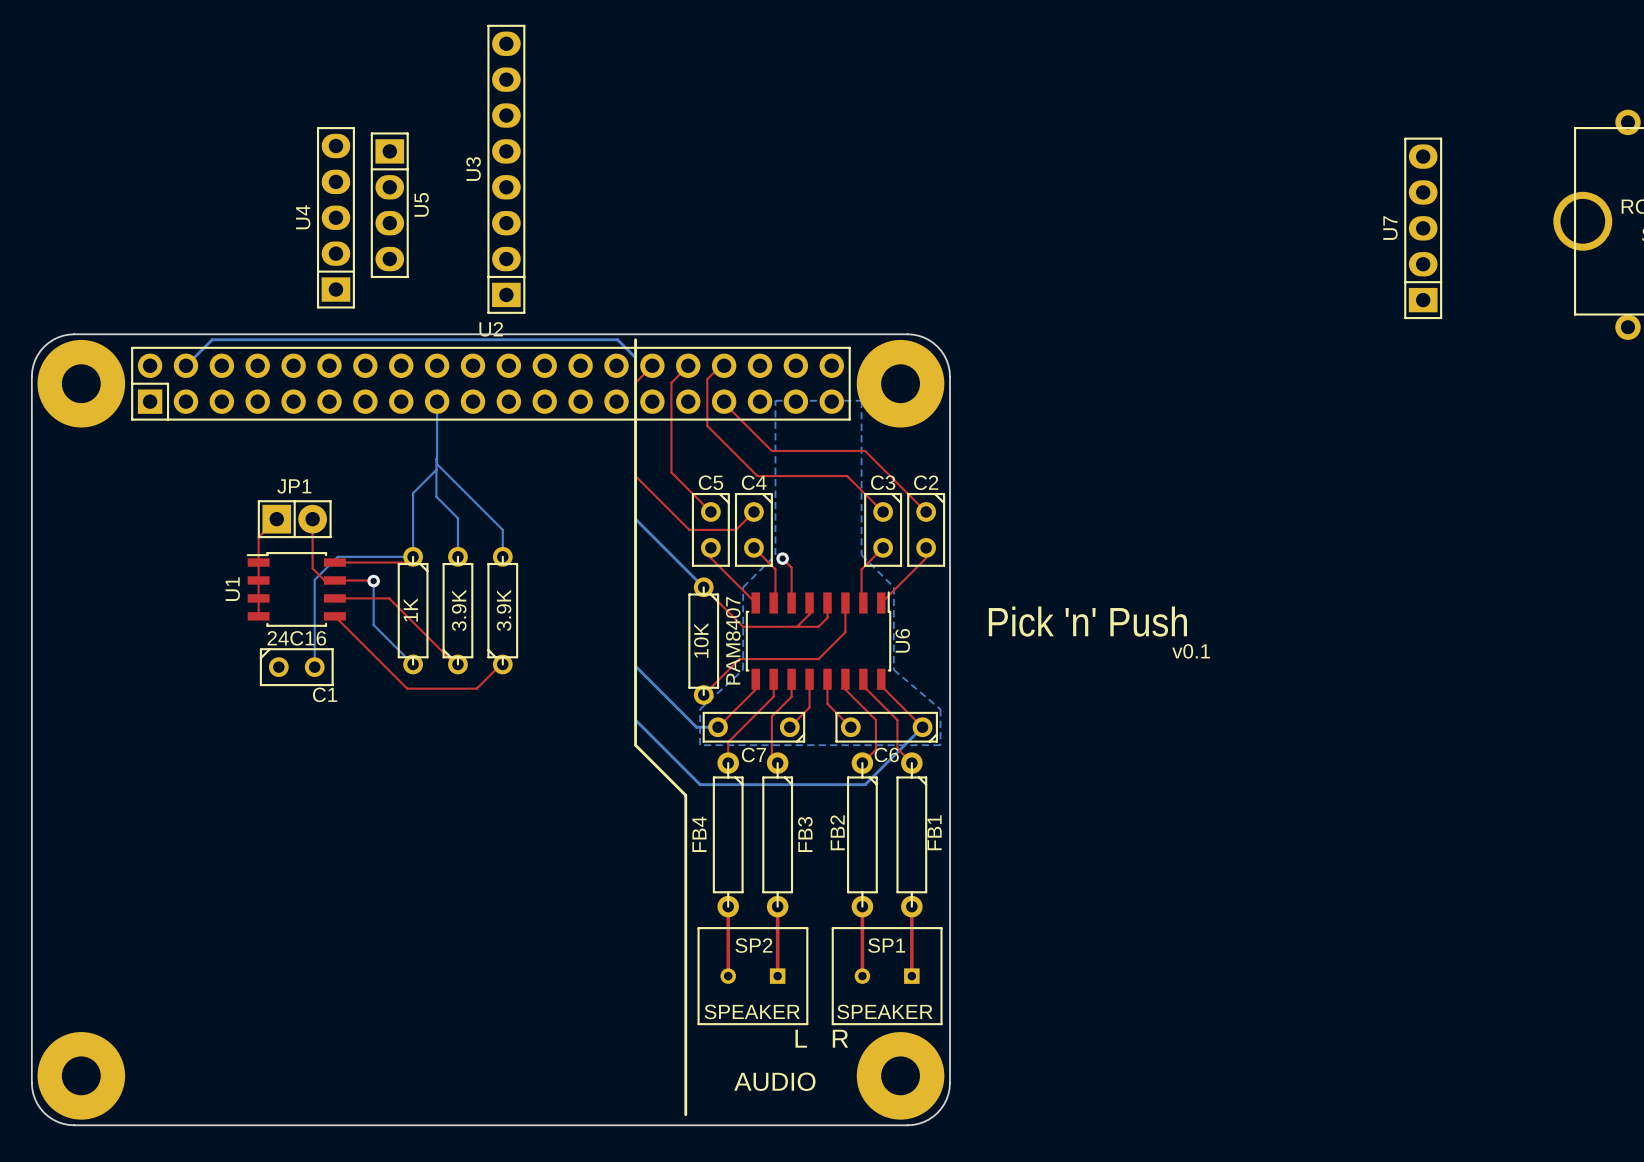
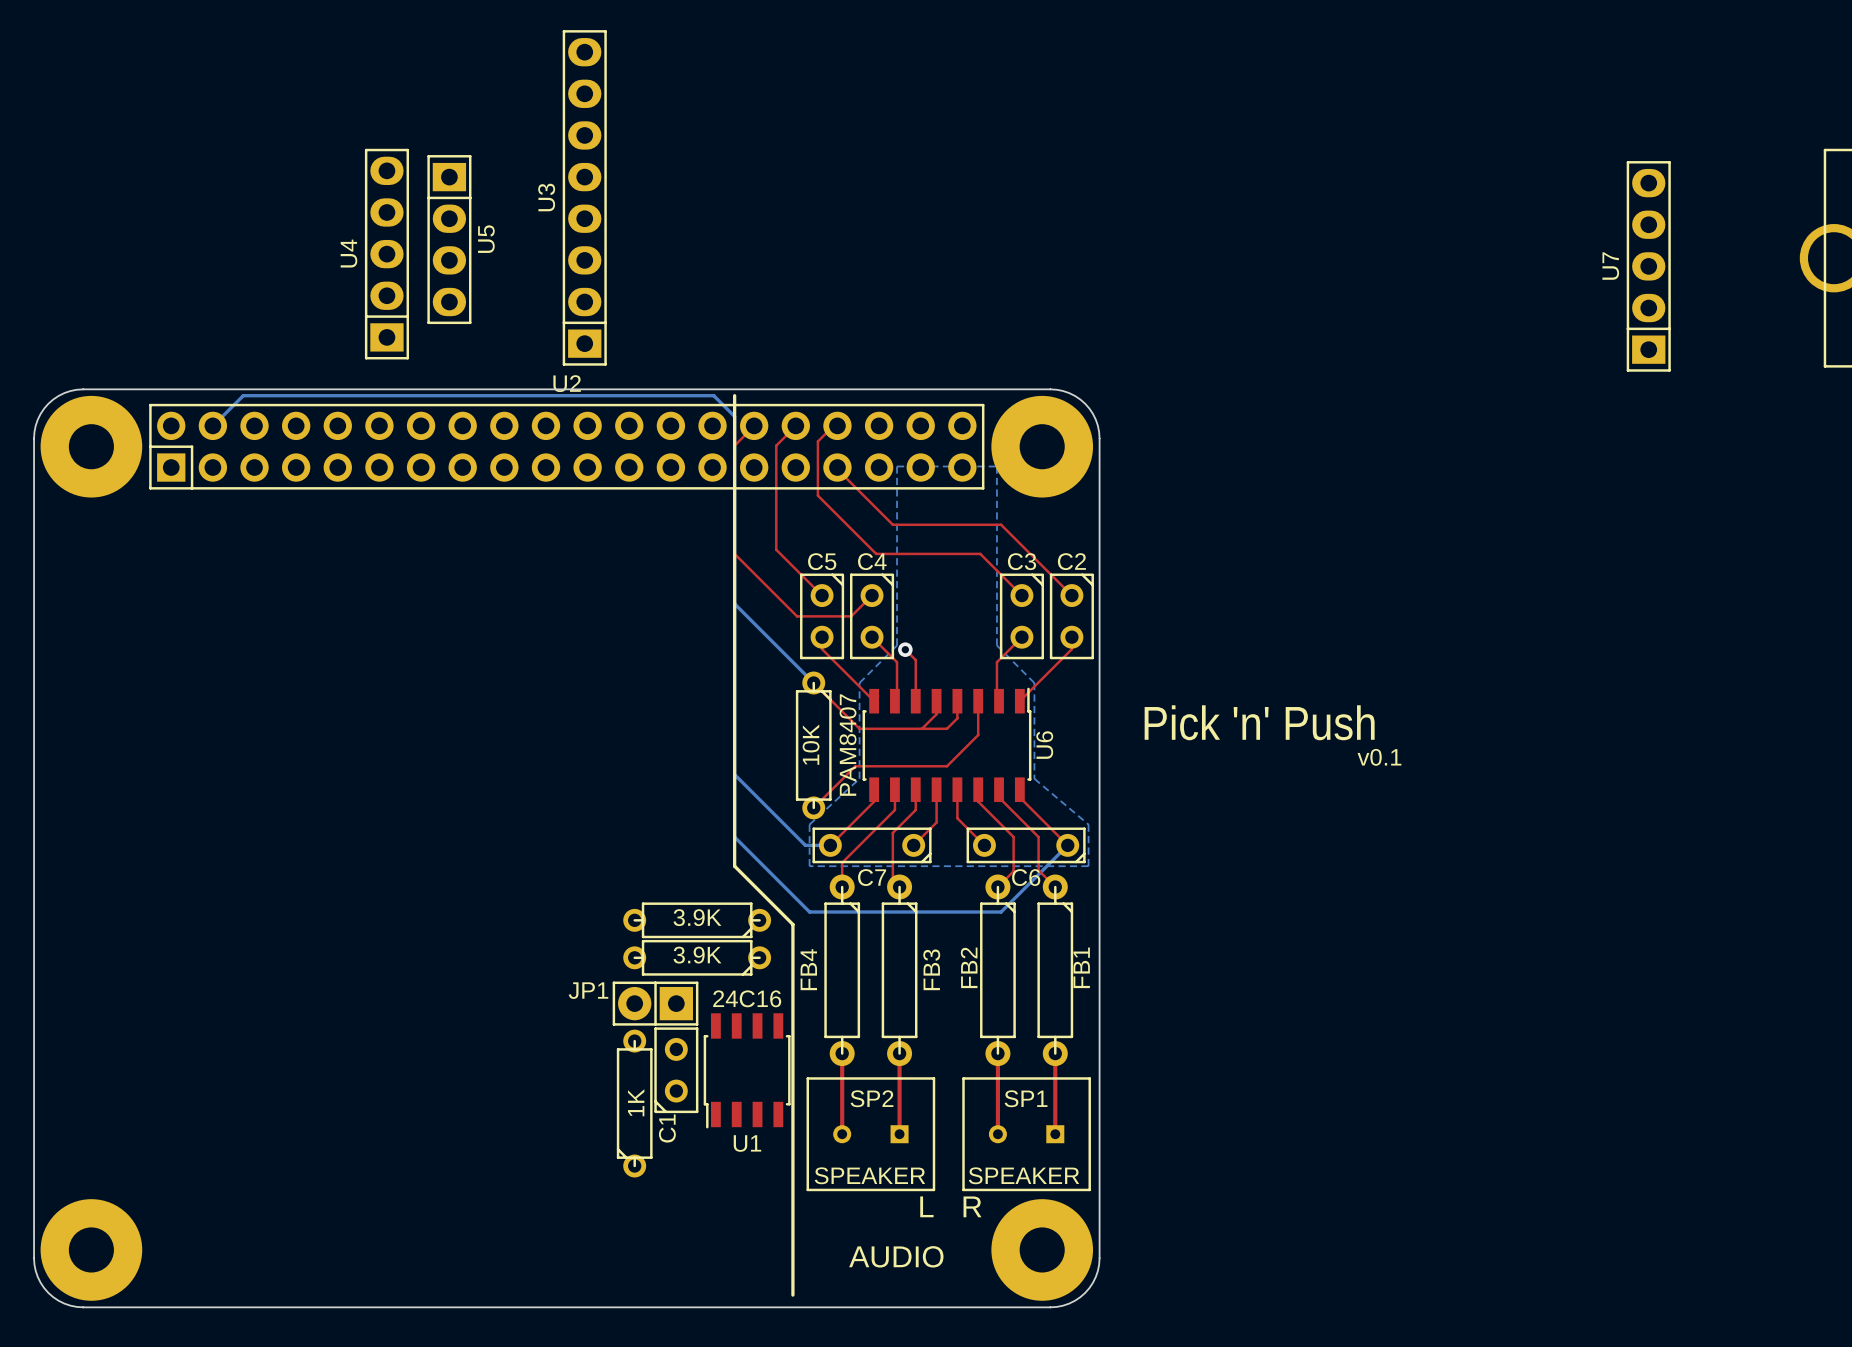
bottom track: (437, 401) (437, 464) (502, 529) (502, 556) -> none
bottom track: (437, 459) (436, 496) (457, 518) (457, 556) -> none
bottom track: (436, 469) (413, 493) (413, 556) (337, 556) (314, 579) (314, 667) -> none
JP1 name position: JP1 (294, 486) -> JP1 (588, 990)
top track: (276, 519) (258, 537) (258, 616) -> none
JP1 rotation: 0° (294, 519) -> 180° (655, 1003)
JP1 position: (294, 519) -> (655, 1003)
top track: (312, 519) (312, 568) (324, 580) (373, 581) -> none
top track: (413, 556) (407, 562) (334, 562) -> none
bottom track: (373, 581) (373, 624) (413, 664) -> none
via: (373, 581) -> none
U1 rotation: 0° (296, 589) -> 90° counterclockwise (747, 1070)
U1 position: (296, 589) -> (747, 1070)
top track: (334, 598) (389, 598) (455, 664) (459, 664) -> none
part: 1K (413, 610) -> none
part: 3.9K (457, 610) -> none
part: 3.9K (502, 610) -> none
top track: (334, 616) (407, 688) (476, 688) (502, 664) -> none
U1 value position: 24C16 (296, 638) -> 24C16 (747, 998)
C1 rotation: 0° (296, 667) -> 90° counterclockwise (676, 1070)
C1 position: (296, 667) -> (676, 1070)
C1 name position: C1 (325, 694) -> C1 (667, 1128)
part: none -> 3.9K (697, 920)
part: none -> 3.9K (697, 957)
part: none -> 1K (634, 1103)

